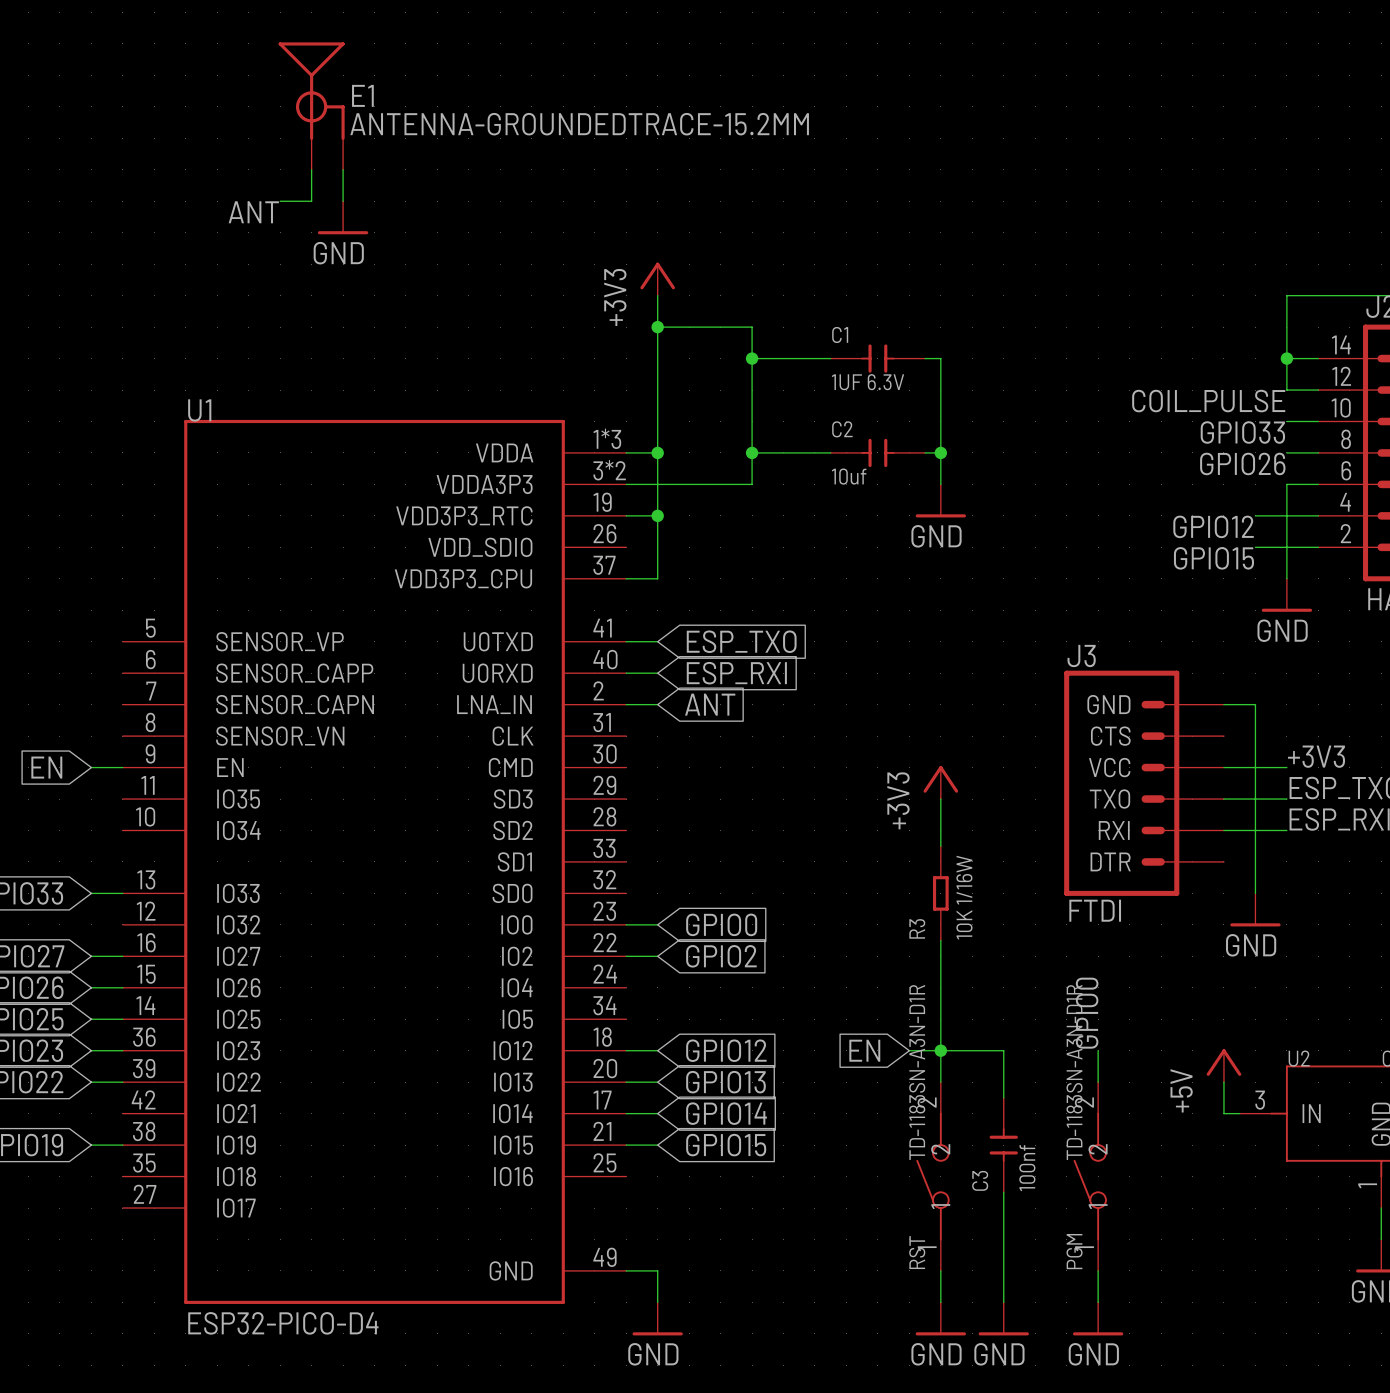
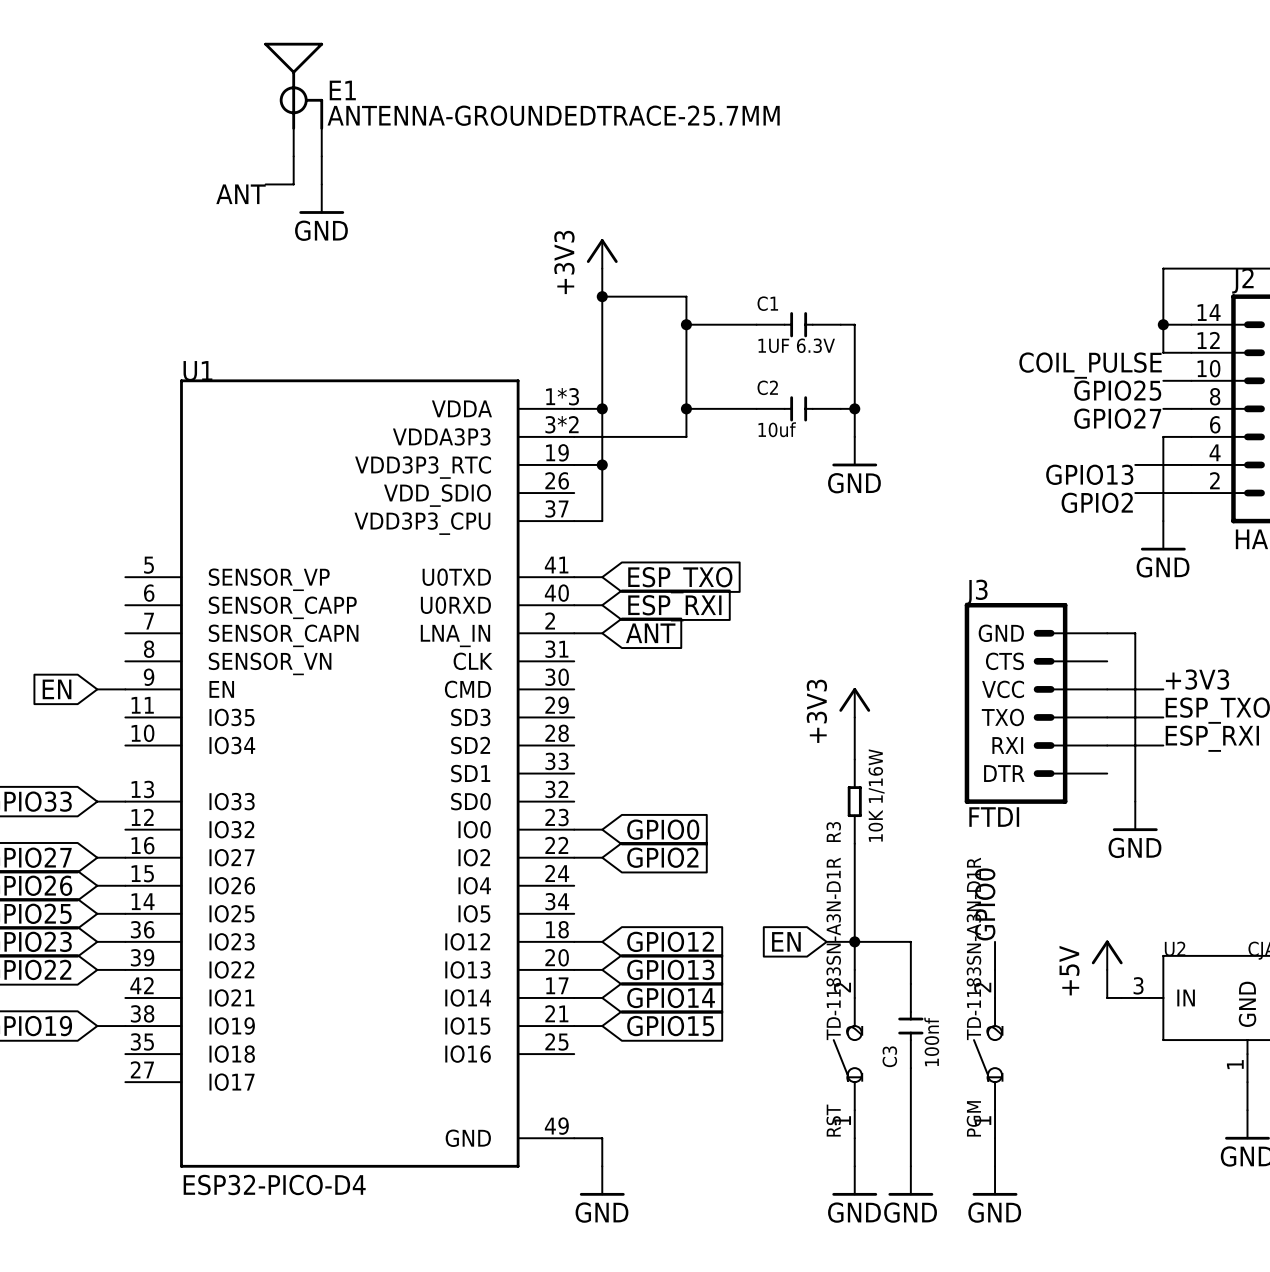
E1 value: ANTENNA-GROUNDEDTRACE-15.2MM (579, 124) -> ANTENNA-GROUNDEDTRACE-25.7MM (553, 115)
label: GPIO33 (1242, 432) -> GPIO25 (1117, 390)
label: GPIO26 (1242, 463) -> GPIO27 (1117, 418)
label: GPIO12 (1213, 526) -> GPIO13 (1089, 474)
label: GPIO15 (1213, 558) -> GPIO2 (1097, 502)

